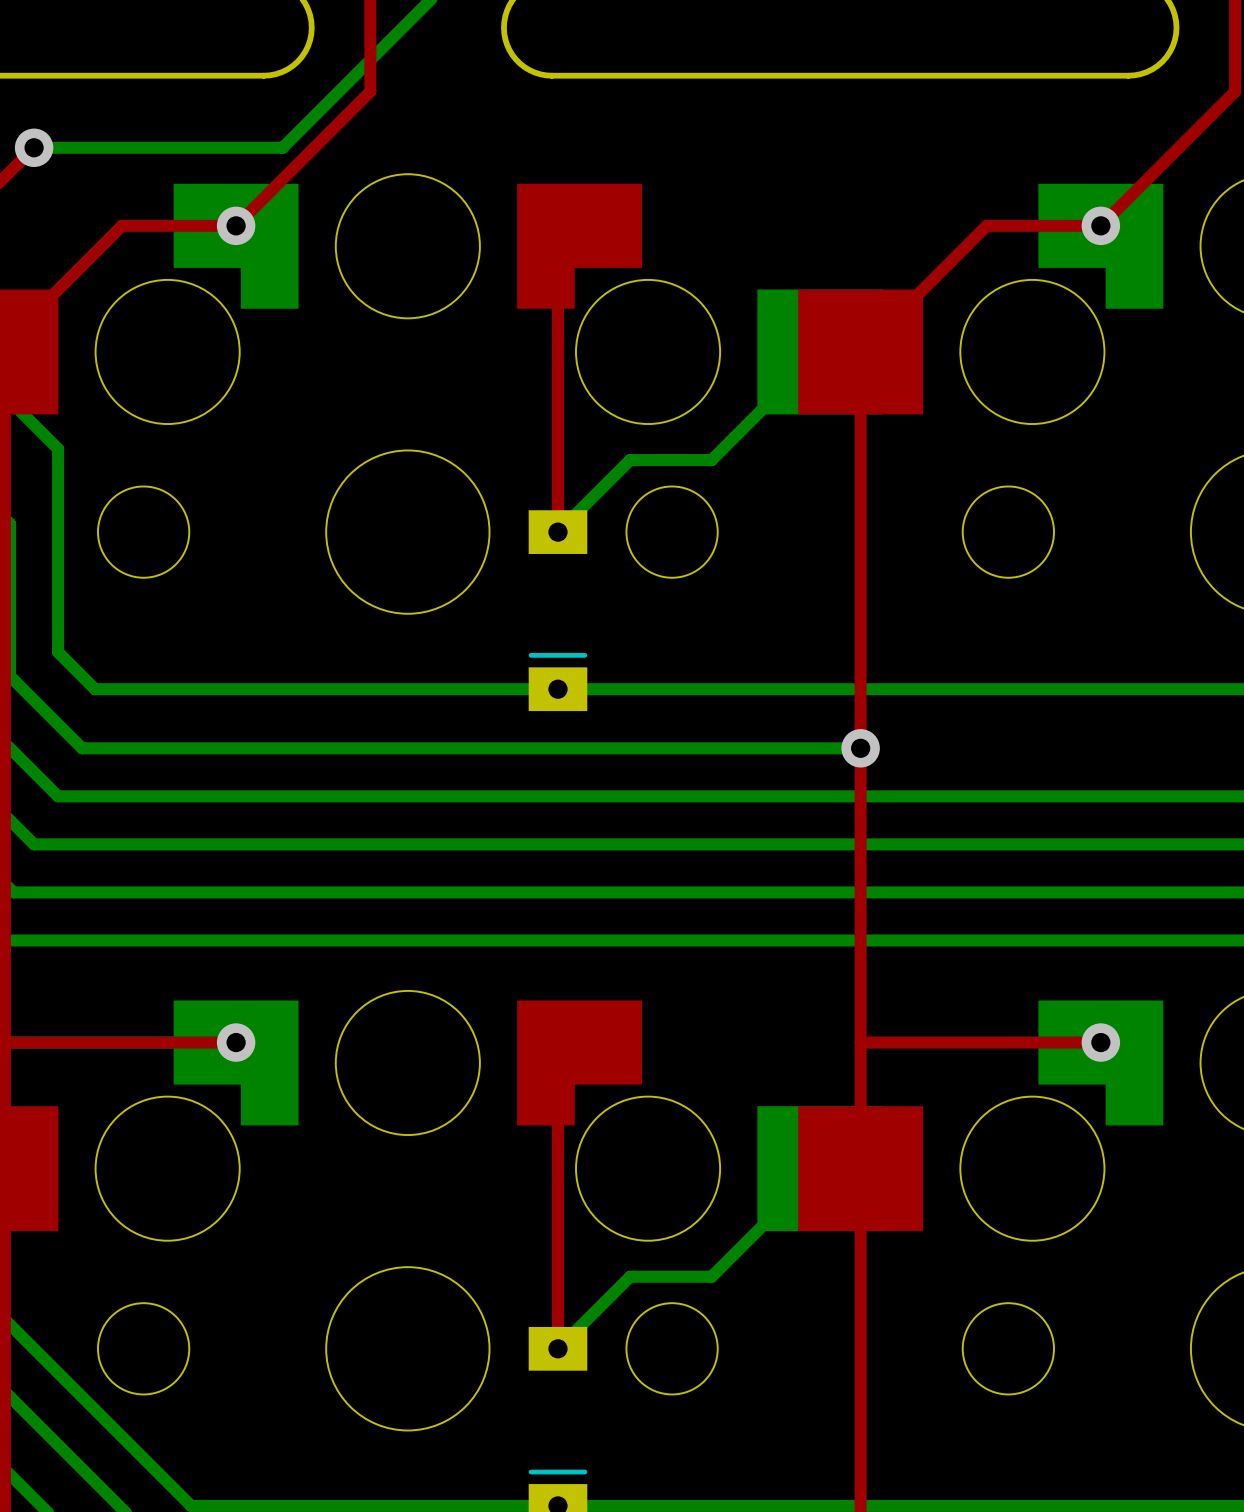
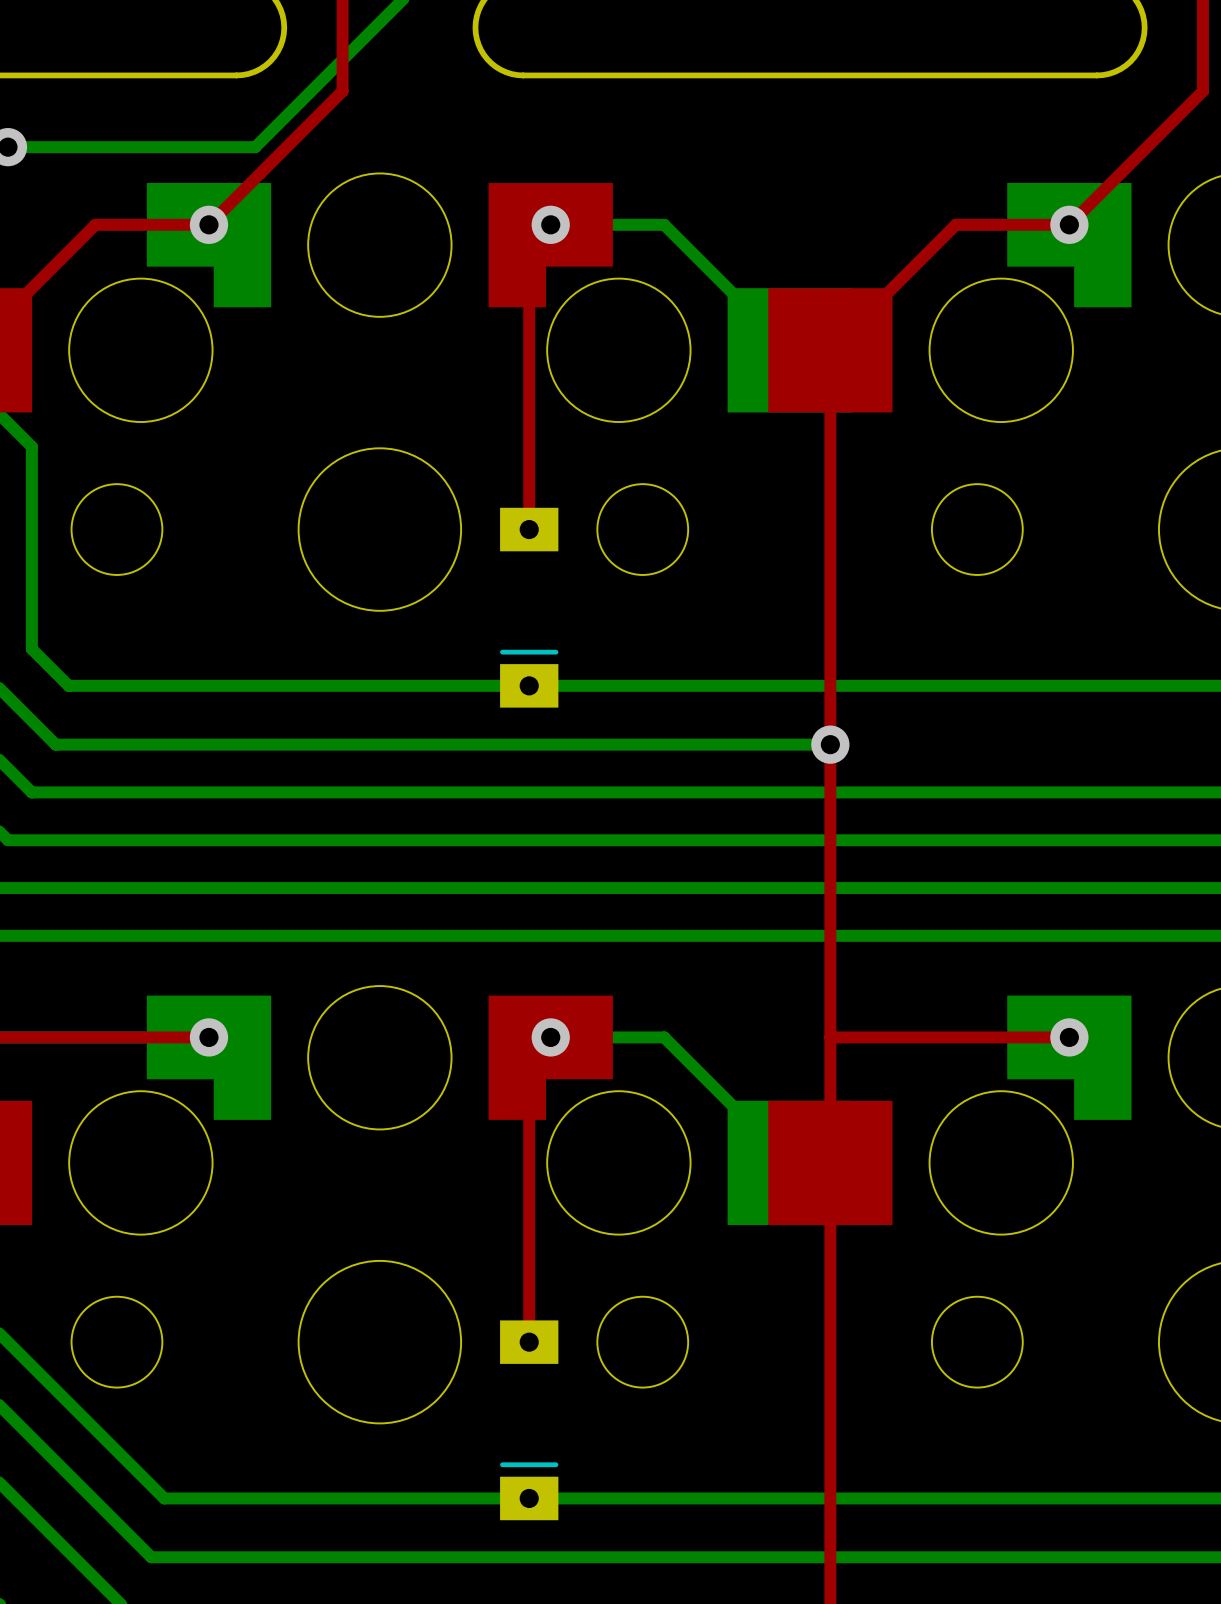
via: none -> (550, 224)
bottom track: (819, 351) (711, 460) (630, 460) (557, 532) -> (789, 350) (664, 224) (550, 224)
via: none -> (550, 1037)
bottom track: (819, 1168) (711, 1276) (630, 1276) (557, 1348) -> (789, 1162) (664, 1037) (550, 1037)

